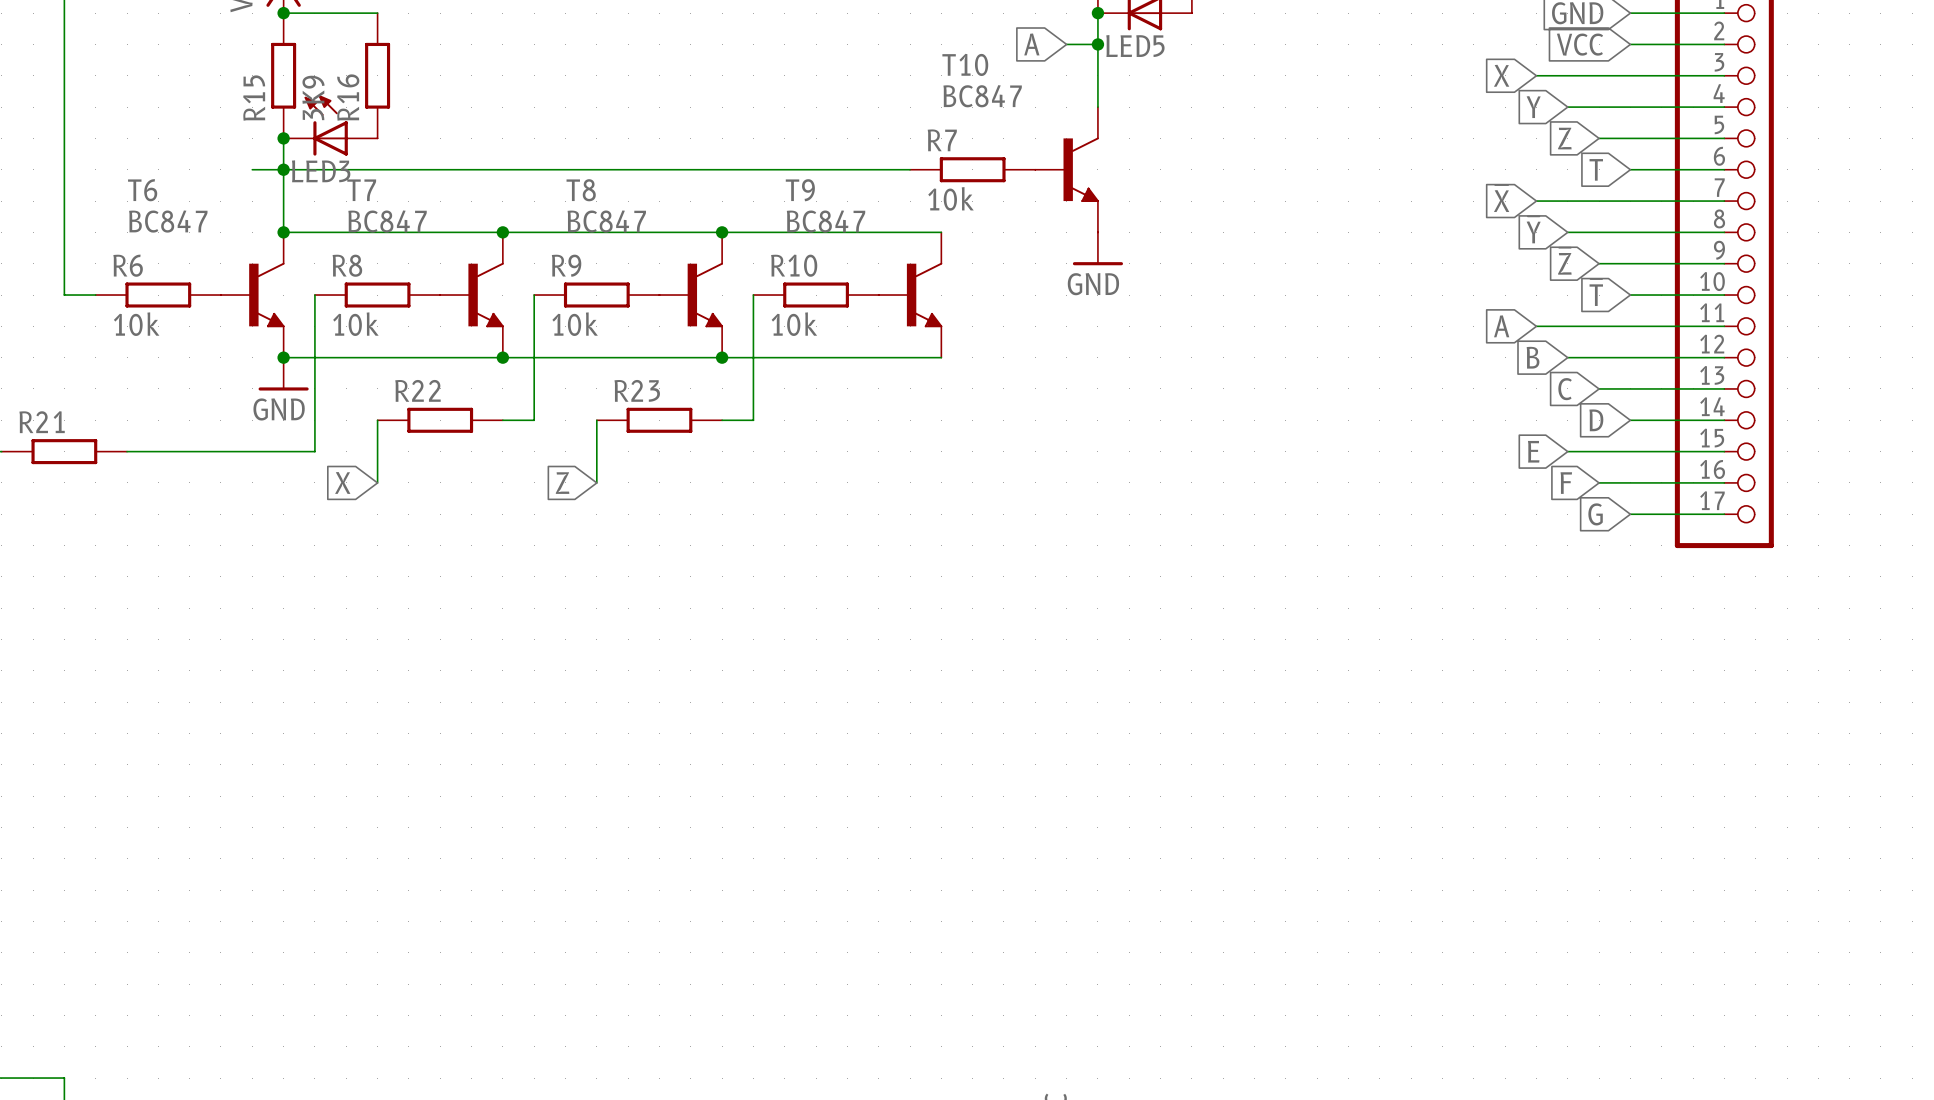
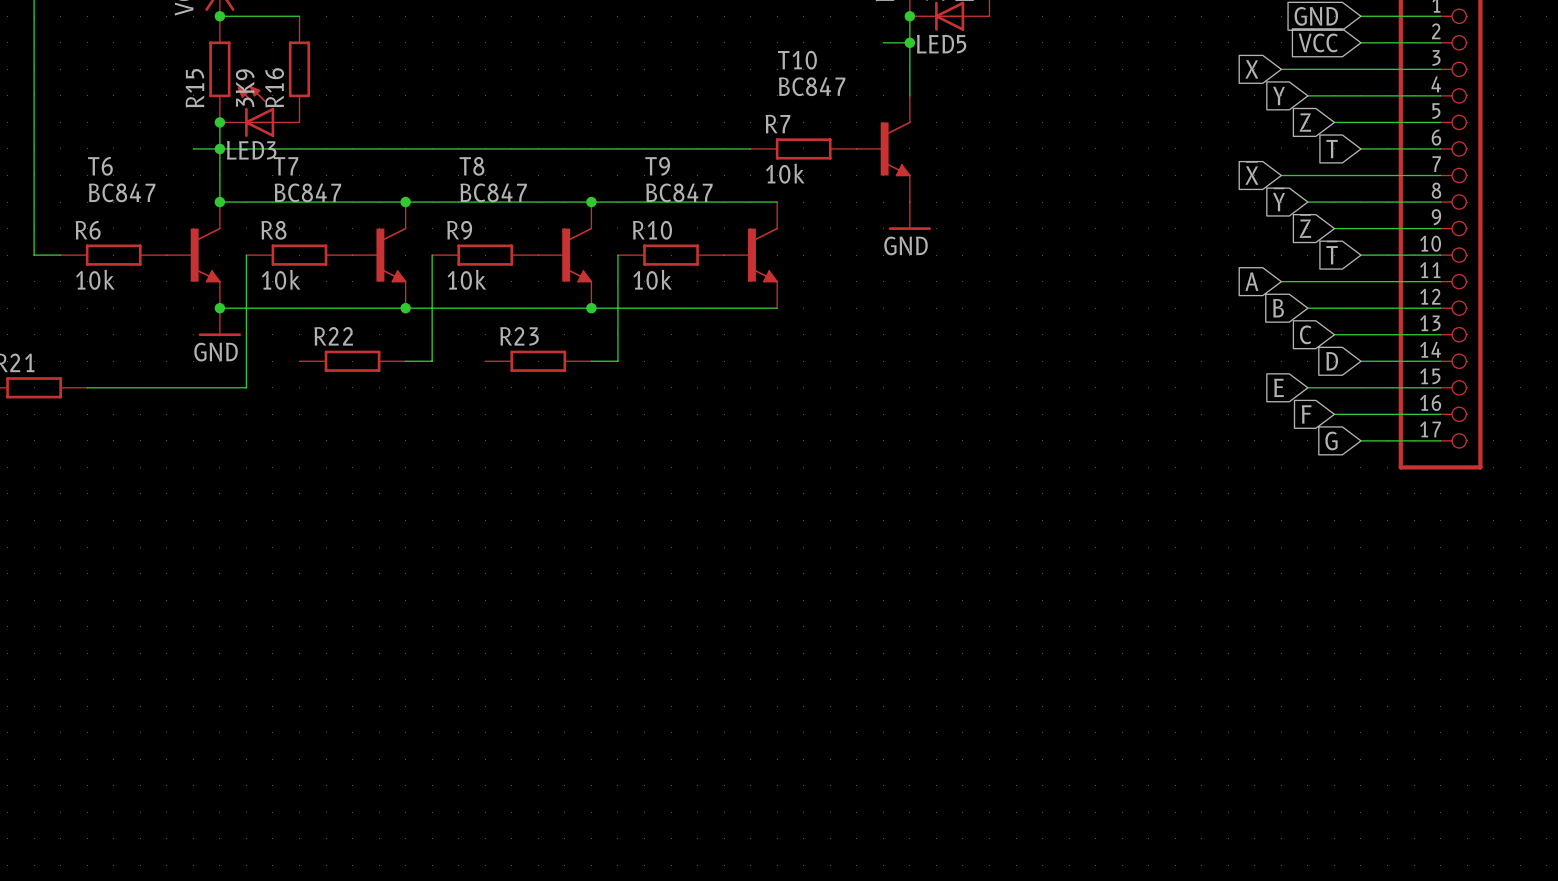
global label: A (1031, 44) -> none
wire: (377, 420) (377, 482) -> none
wire: (596, 420) (596, 482) -> none
global label: X (342, 482) -> none
global label: Z (562, 483) -> none

